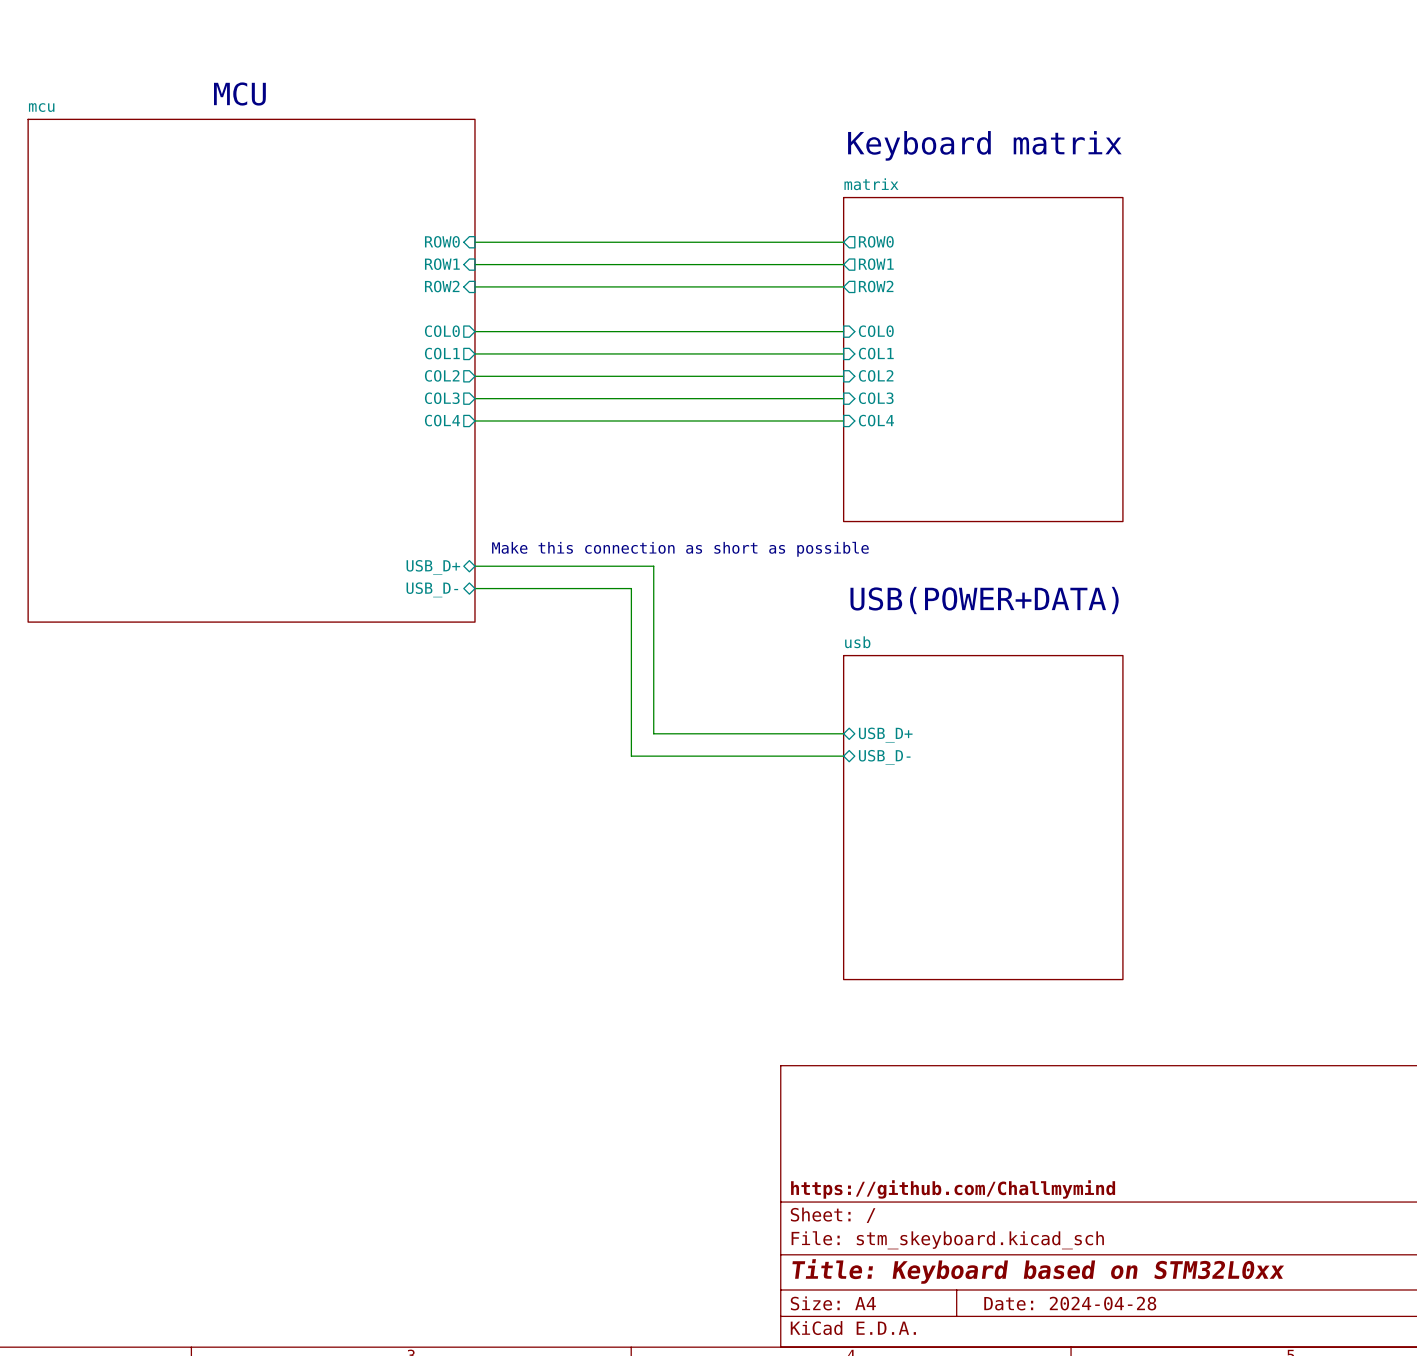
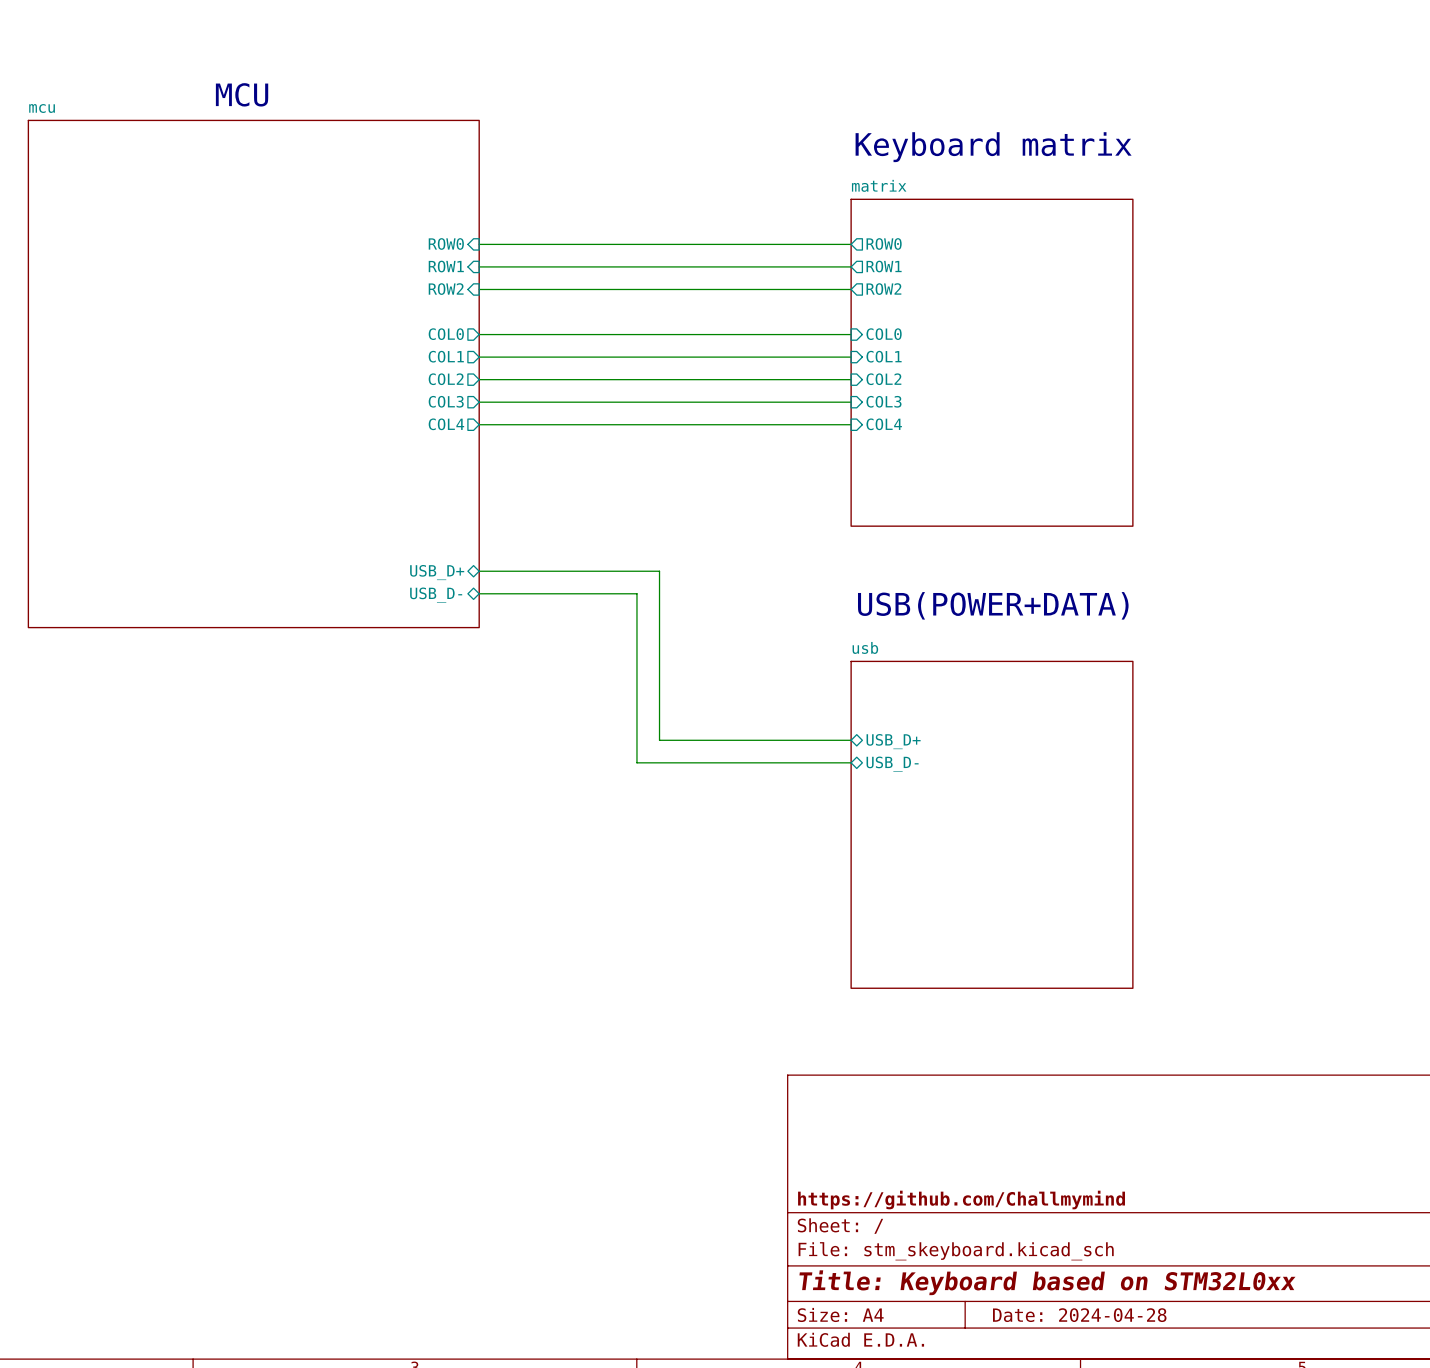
text: Make this connection as short as possible (680, 549) -> none

